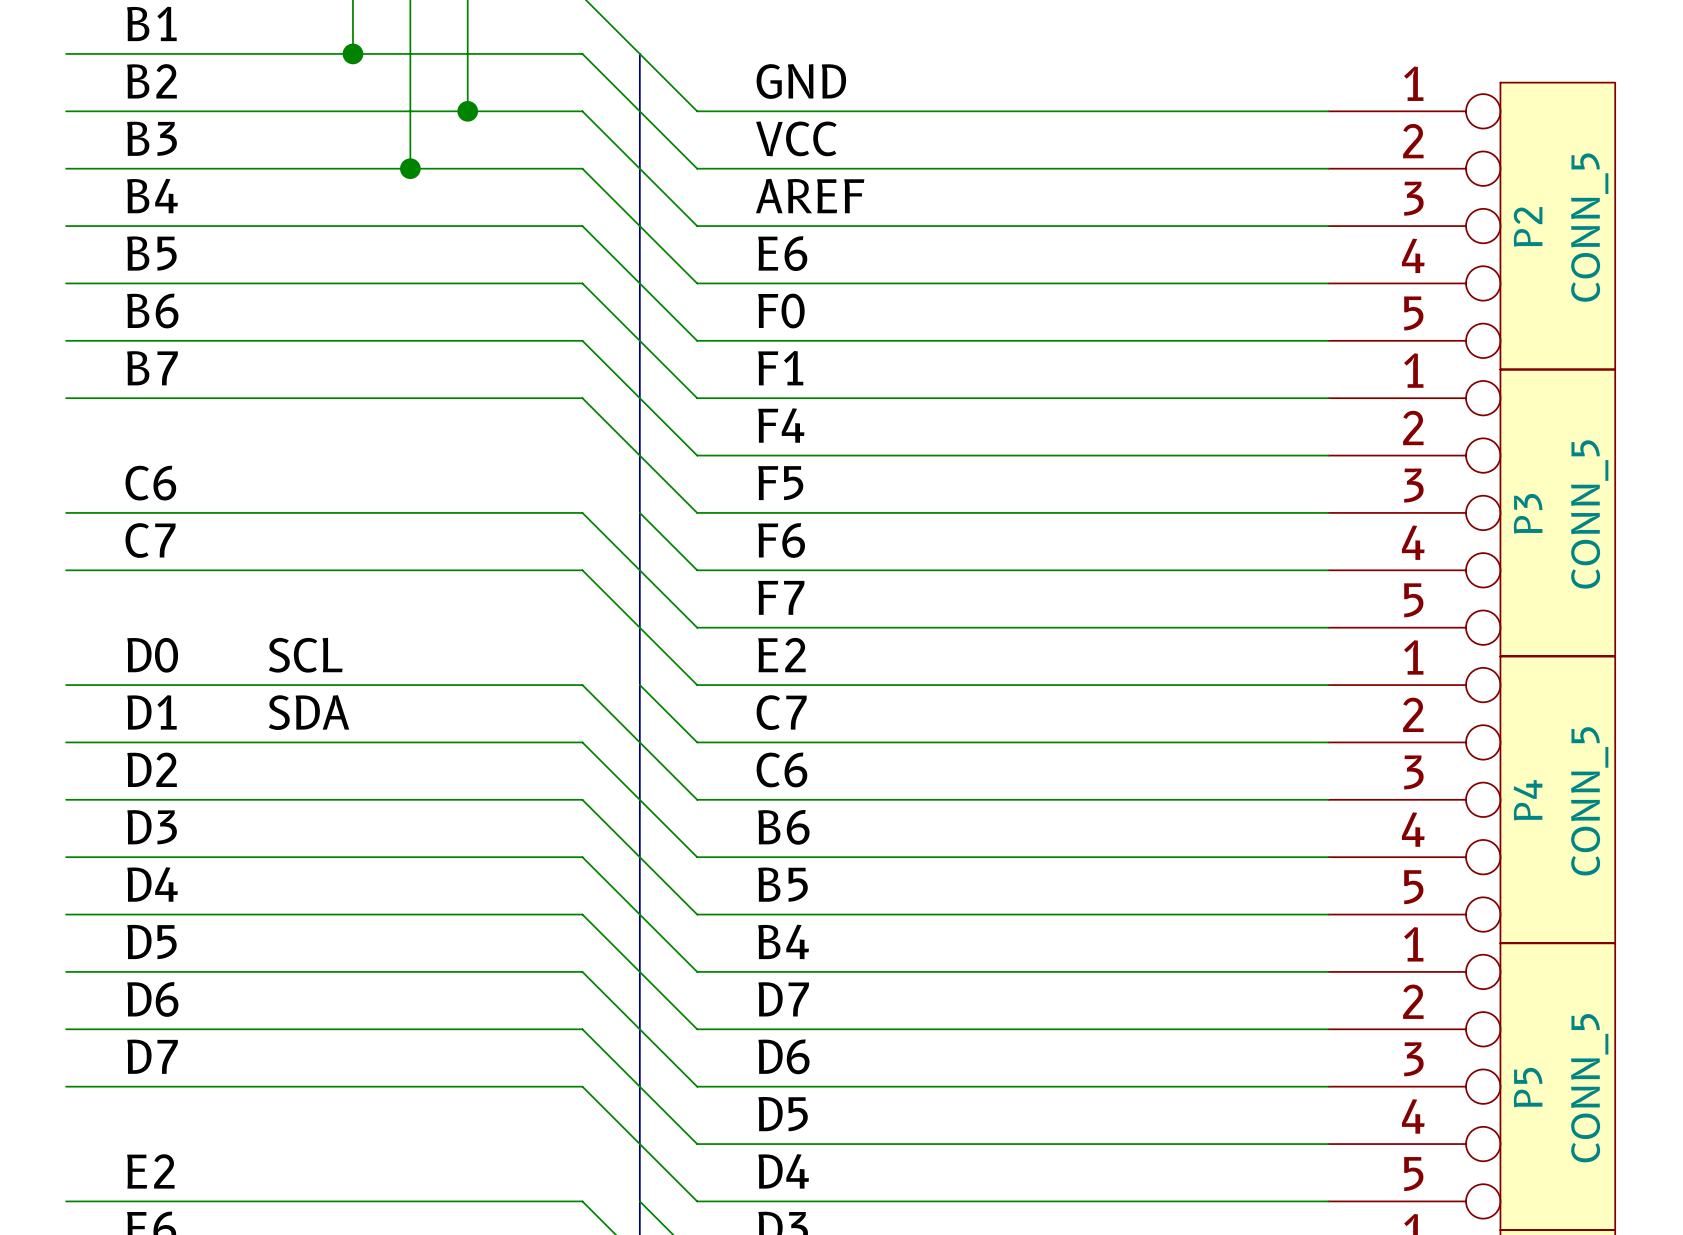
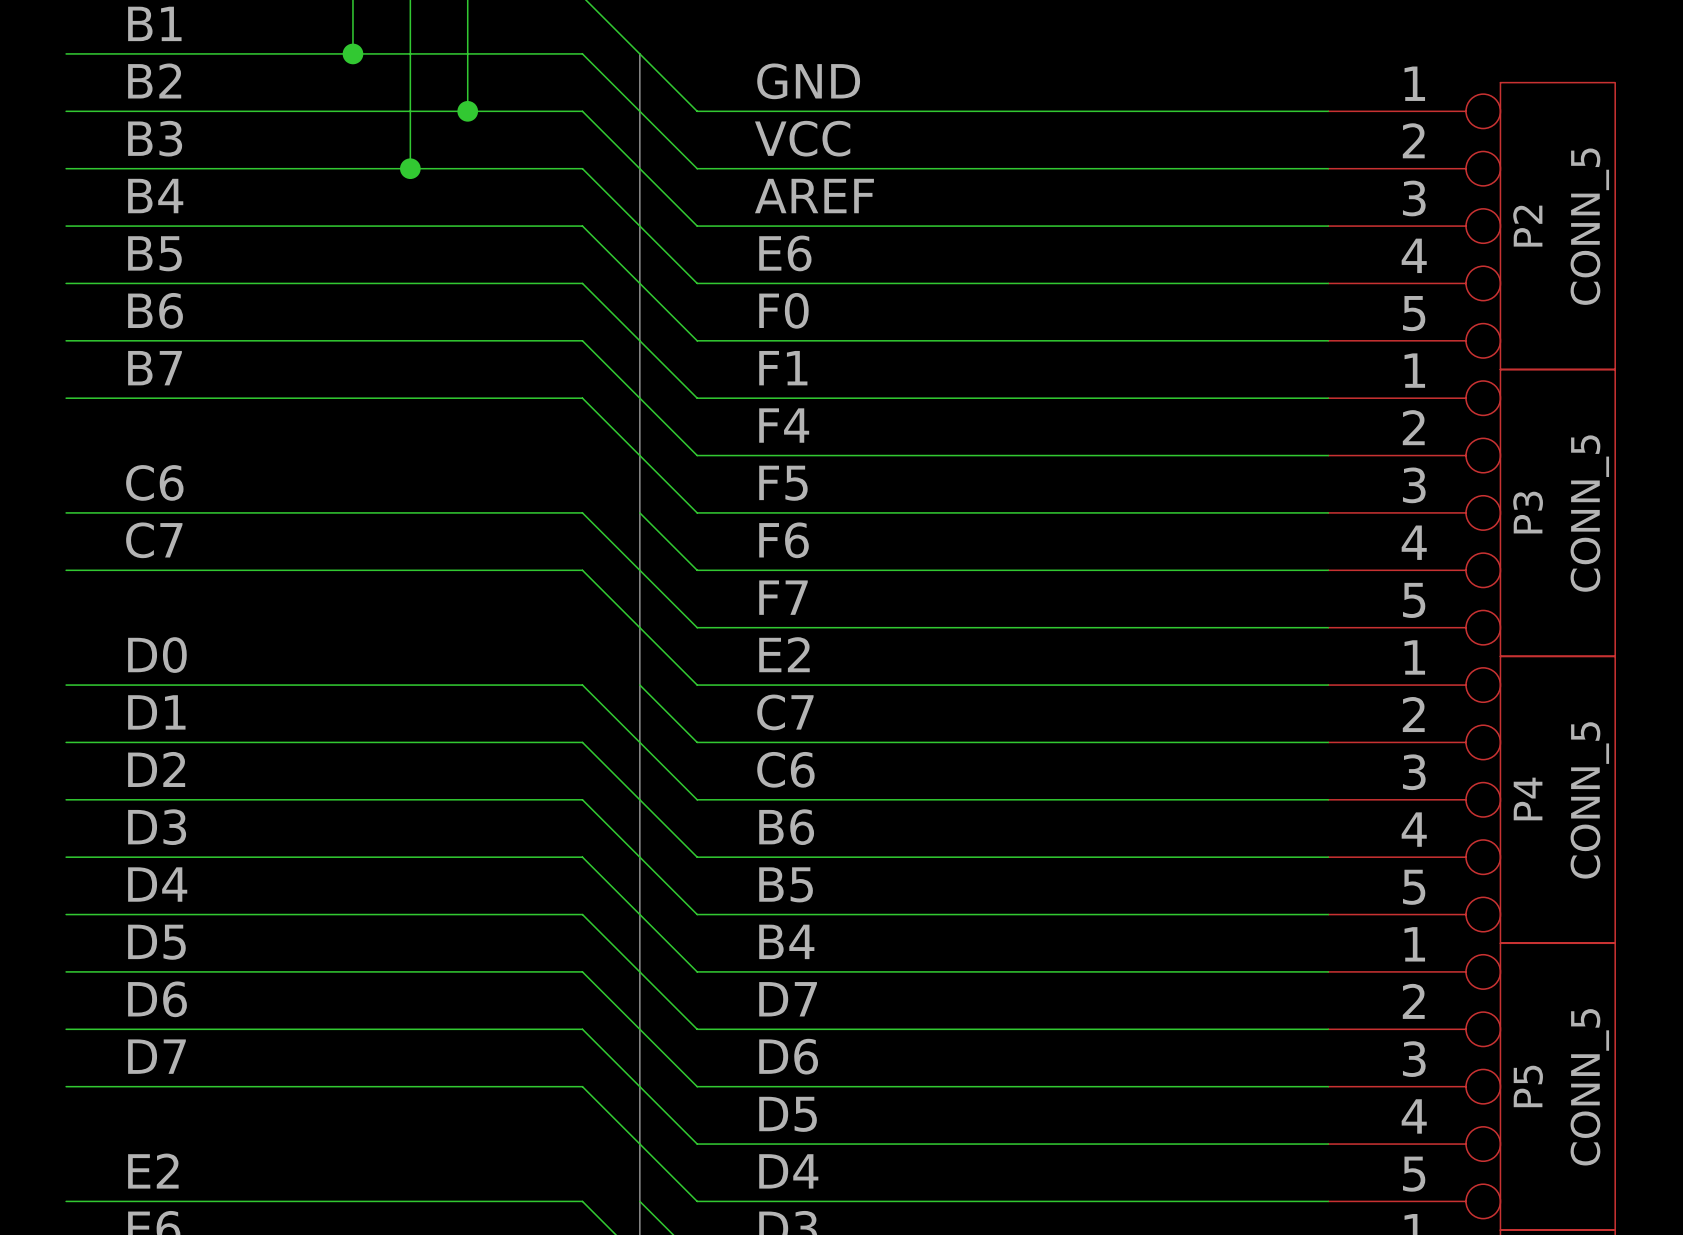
label: SCL (305, 655) -> none
label: SDA (309, 712) -> none

